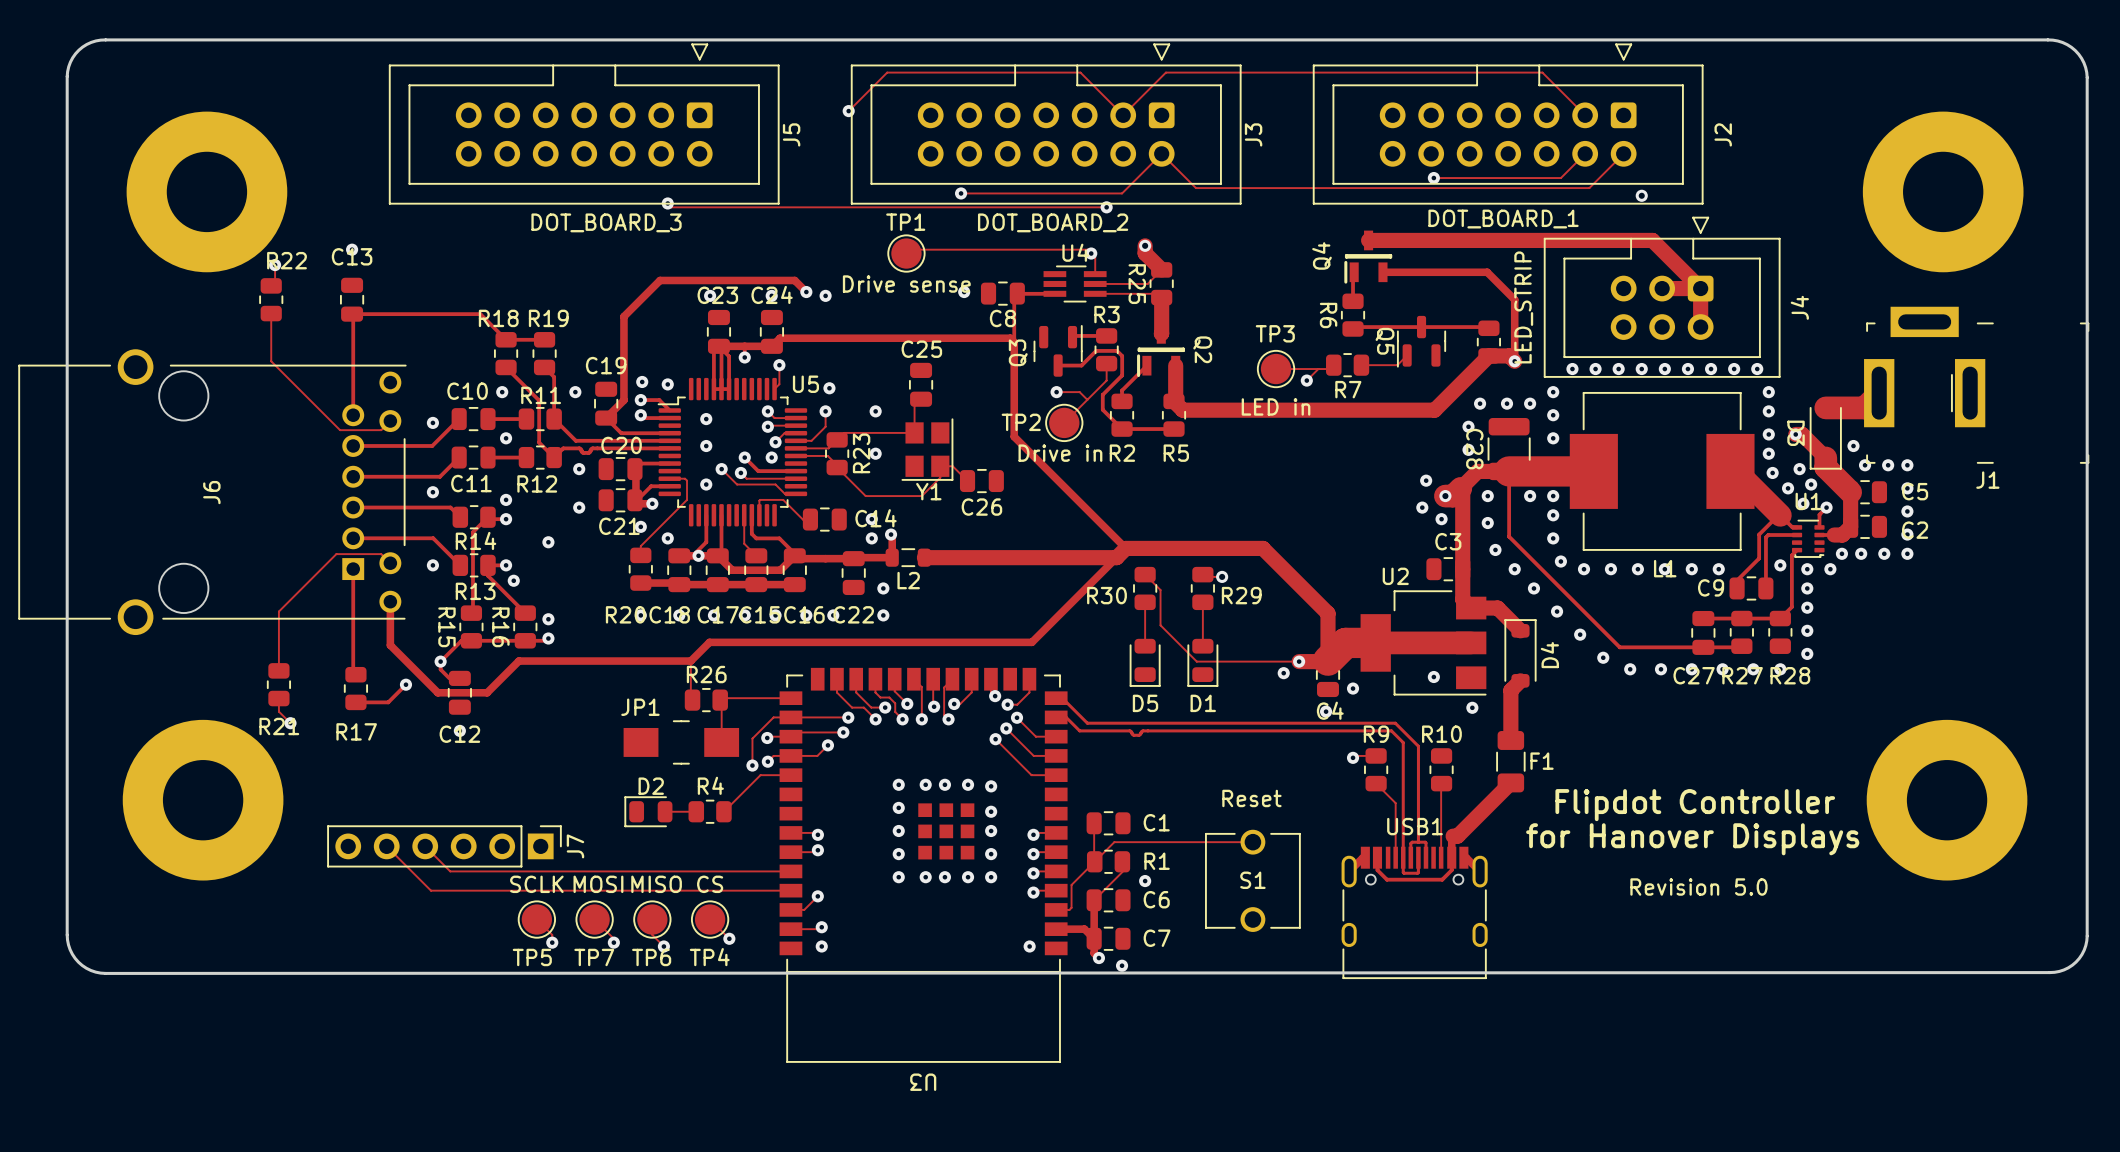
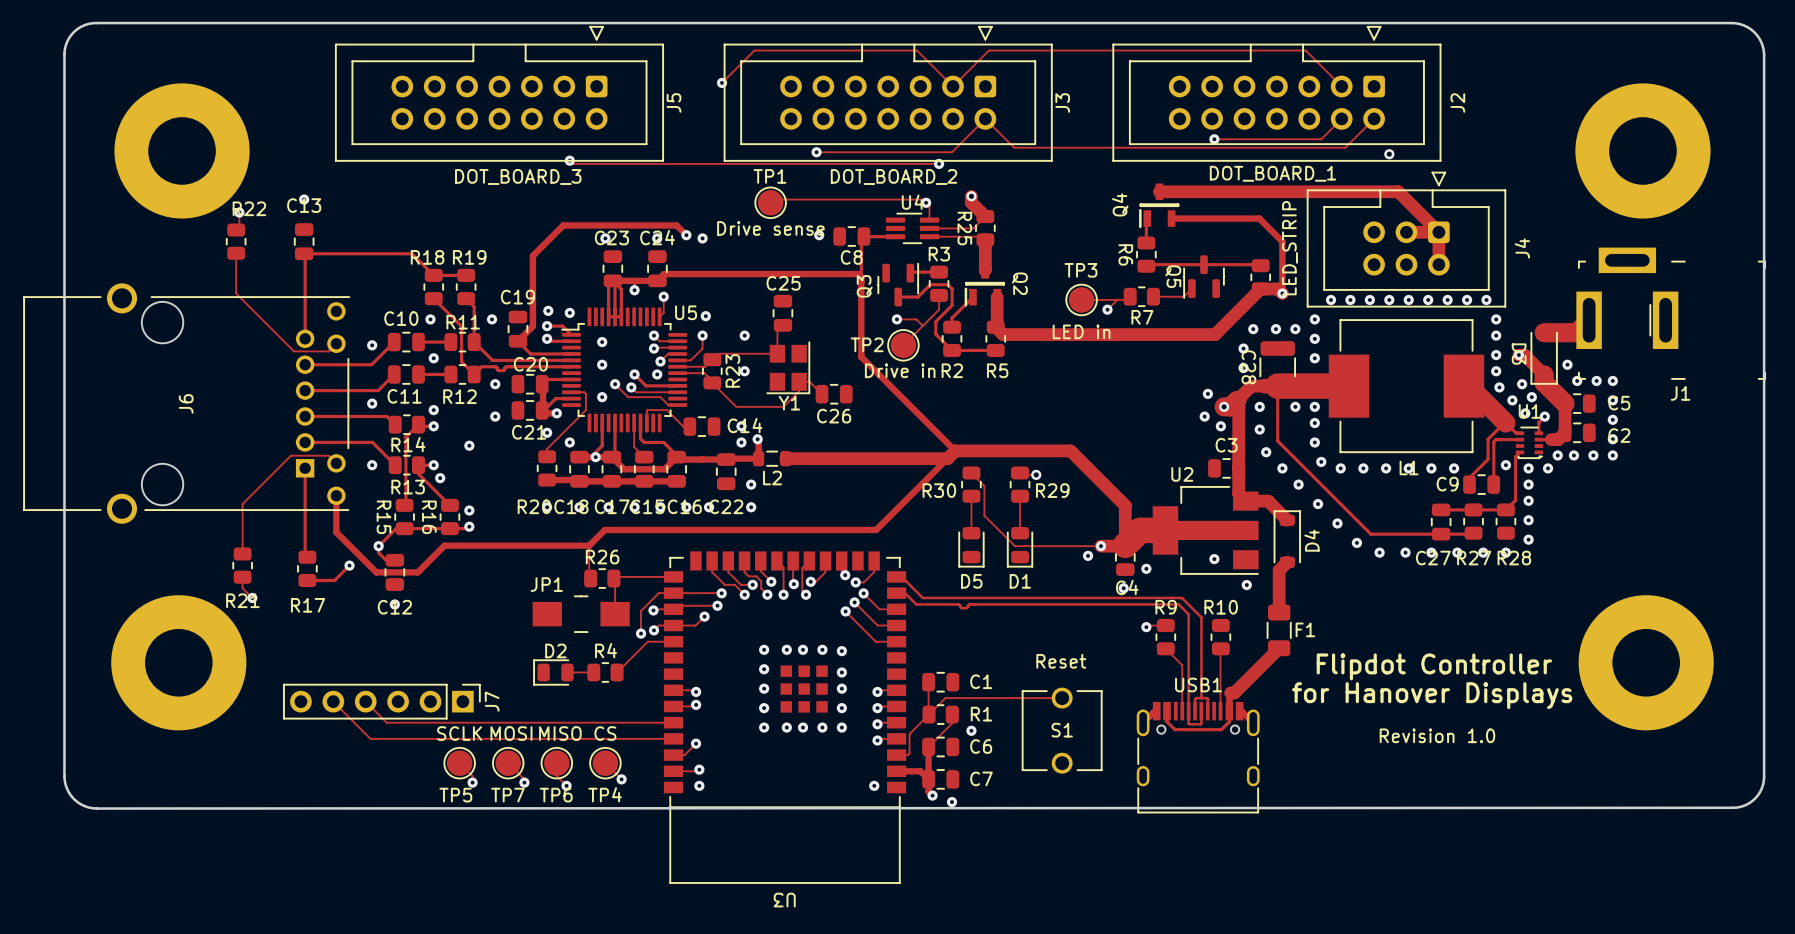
text: Revision 5.0 (1698, 887) -> Revision 1.0 (1437, 735)

